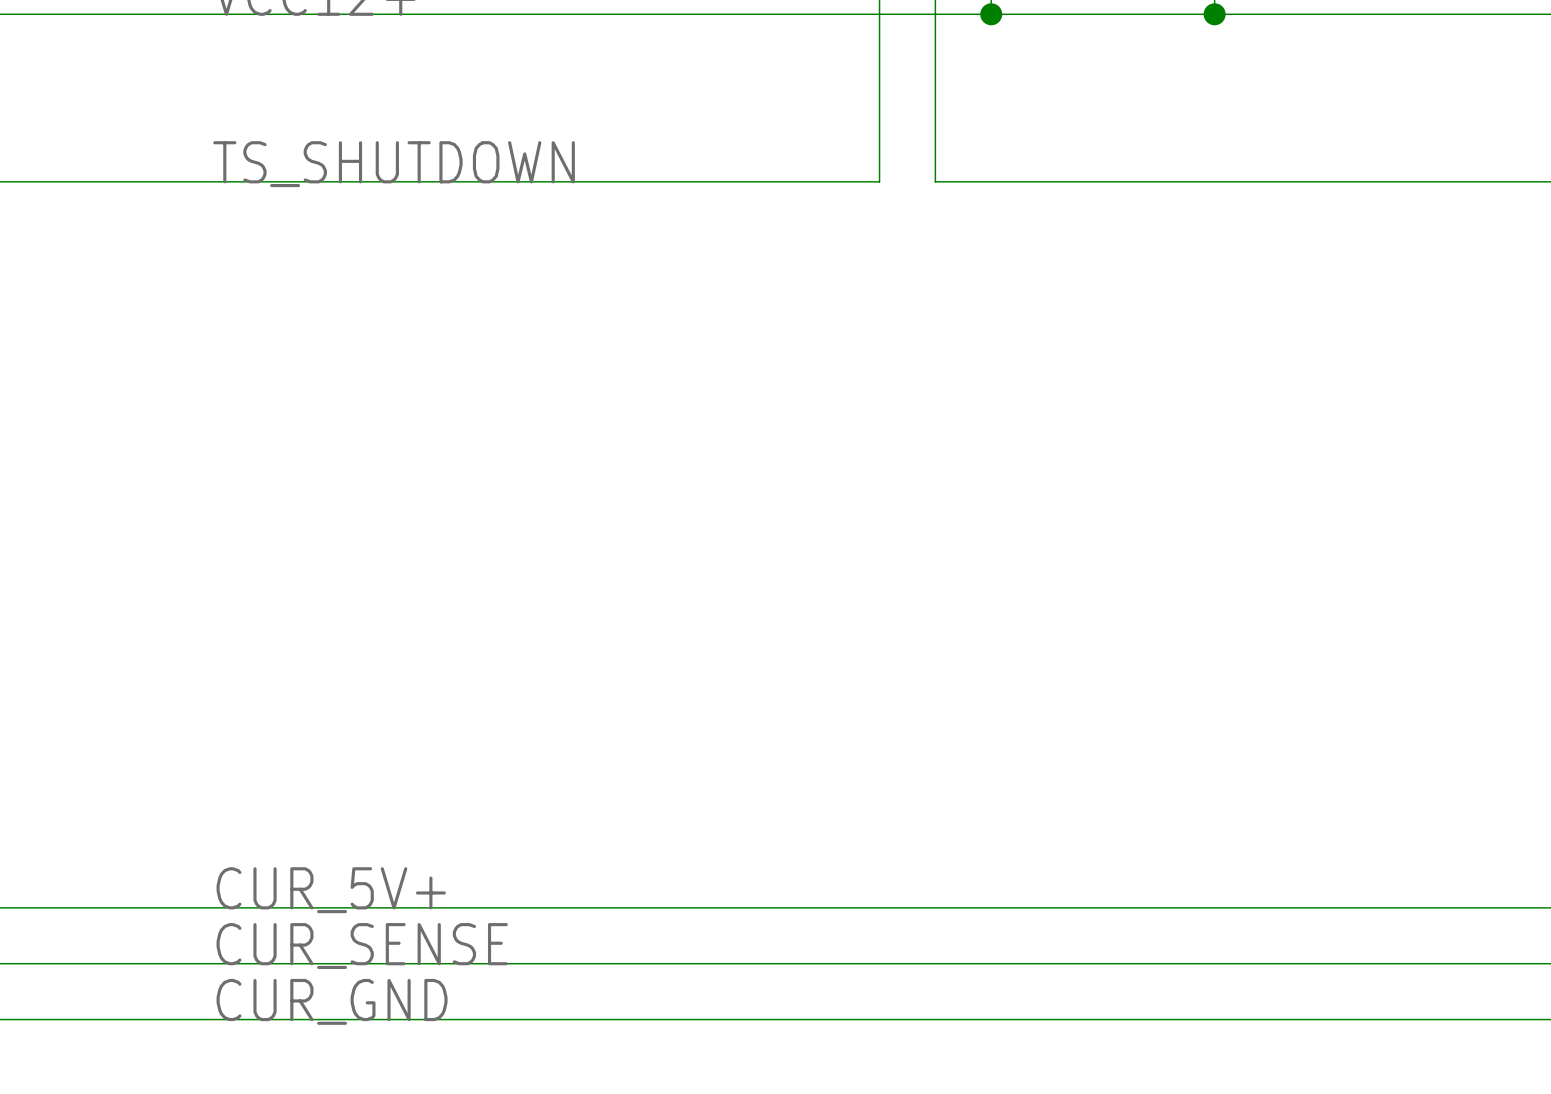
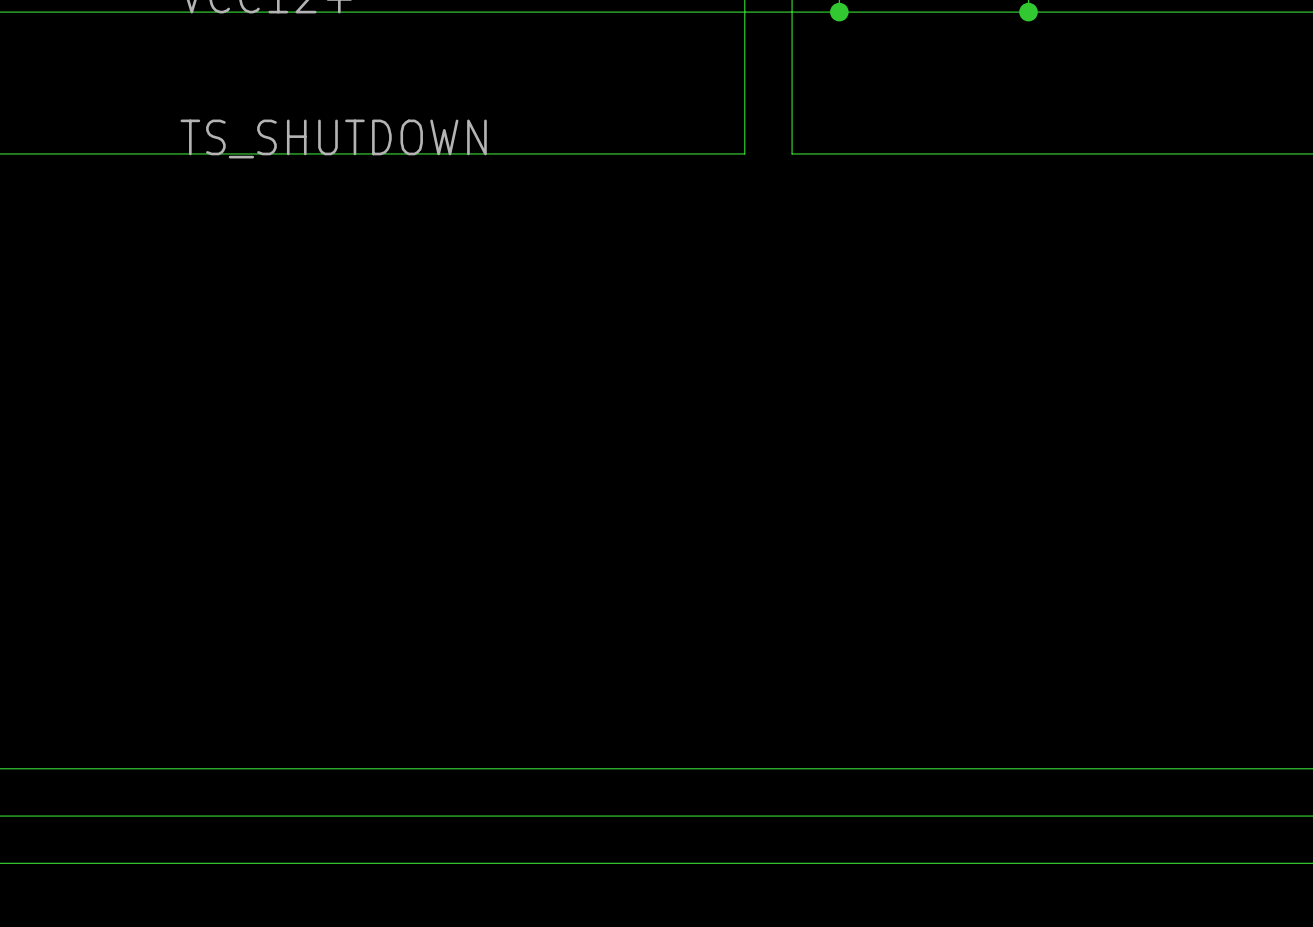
label: CUR_5V+ (331, 890) -> none
label: CUR_SENSE (362, 946) -> none
label: CUR_GND (332, 1001) -> none

